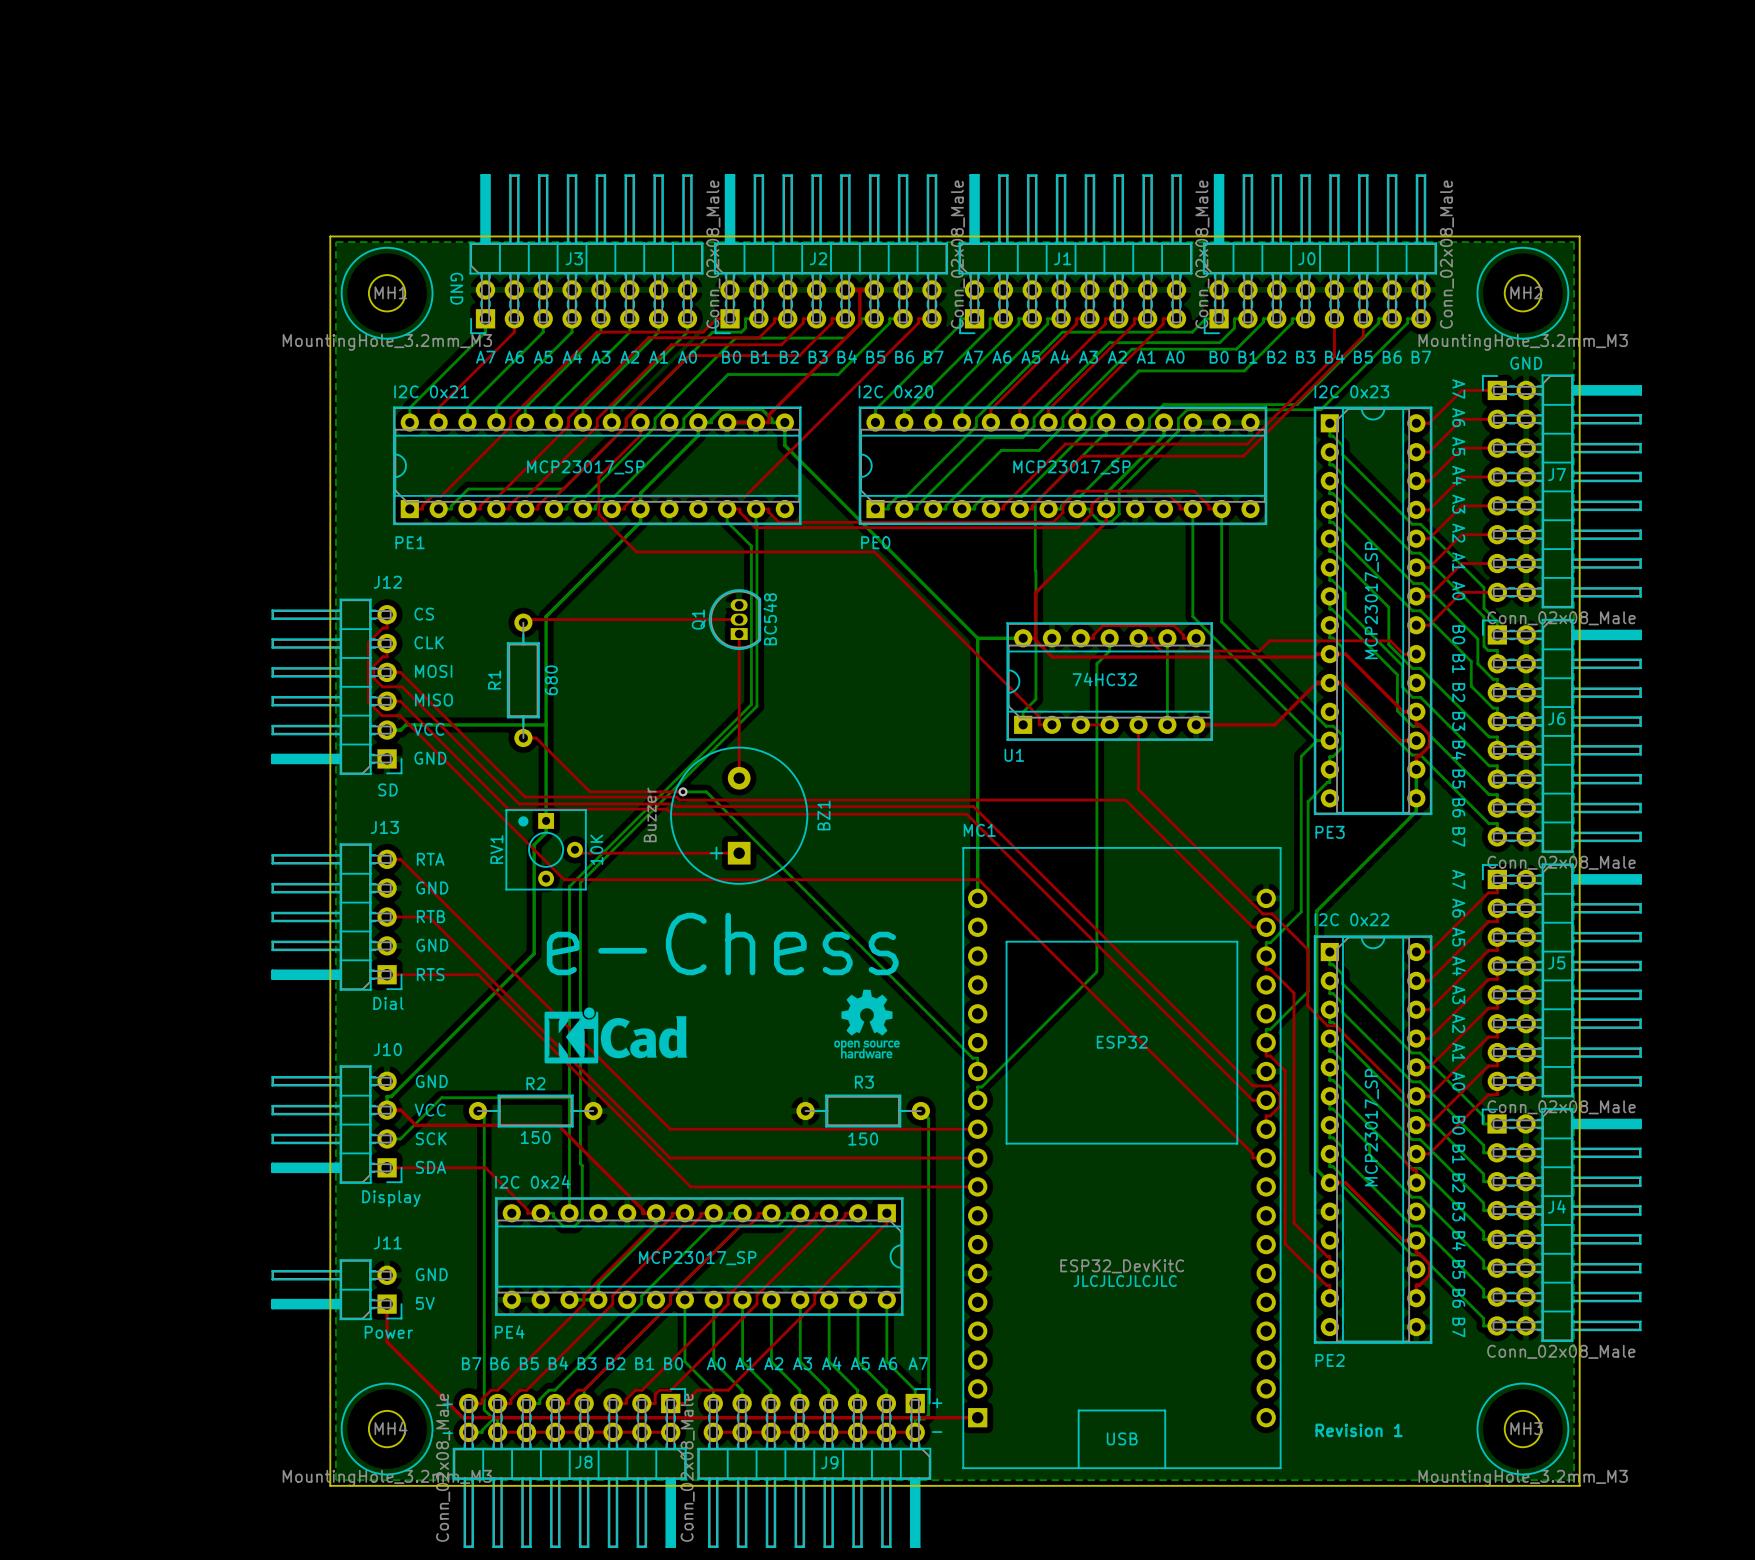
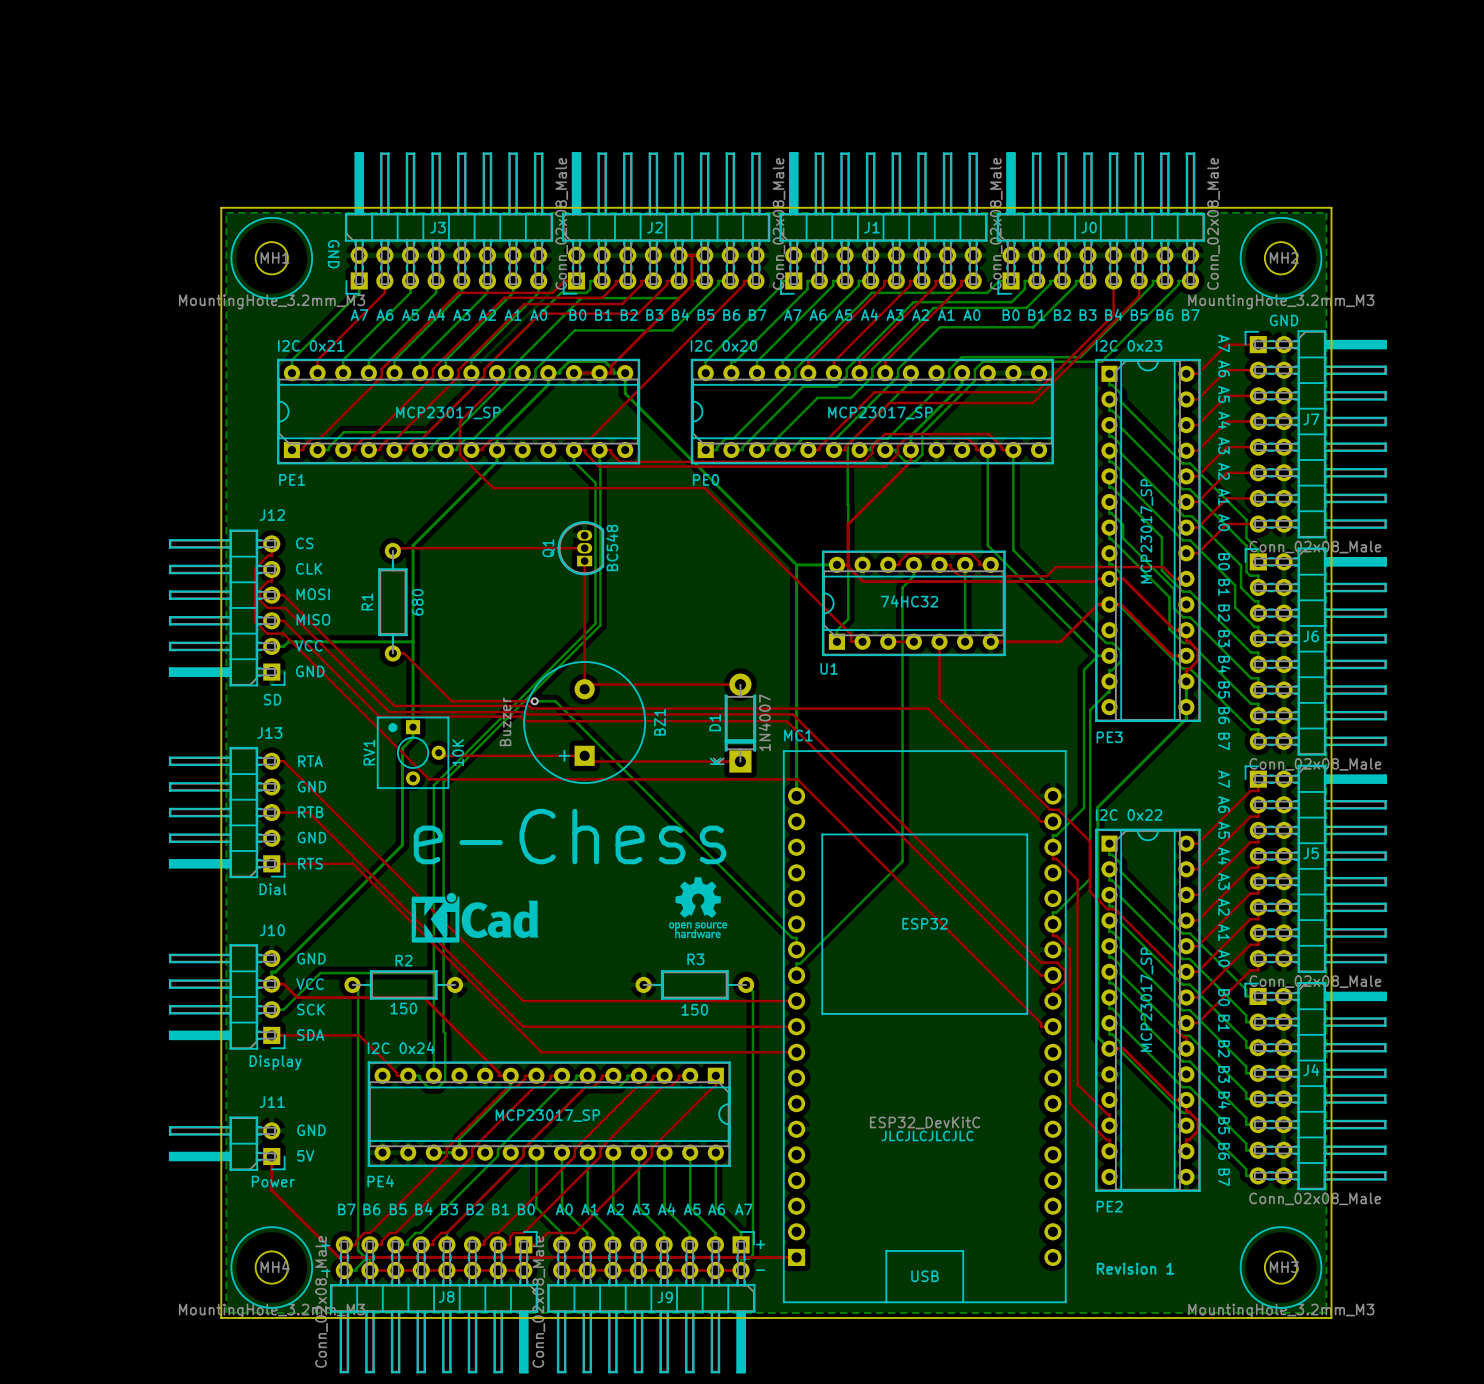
top track: none -> (740, 684) (589, 684) (584, 689)
D1: none -> 1N4007 (740, 723)
top track: none -> (584, 755) (590, 761) (740, 761)

